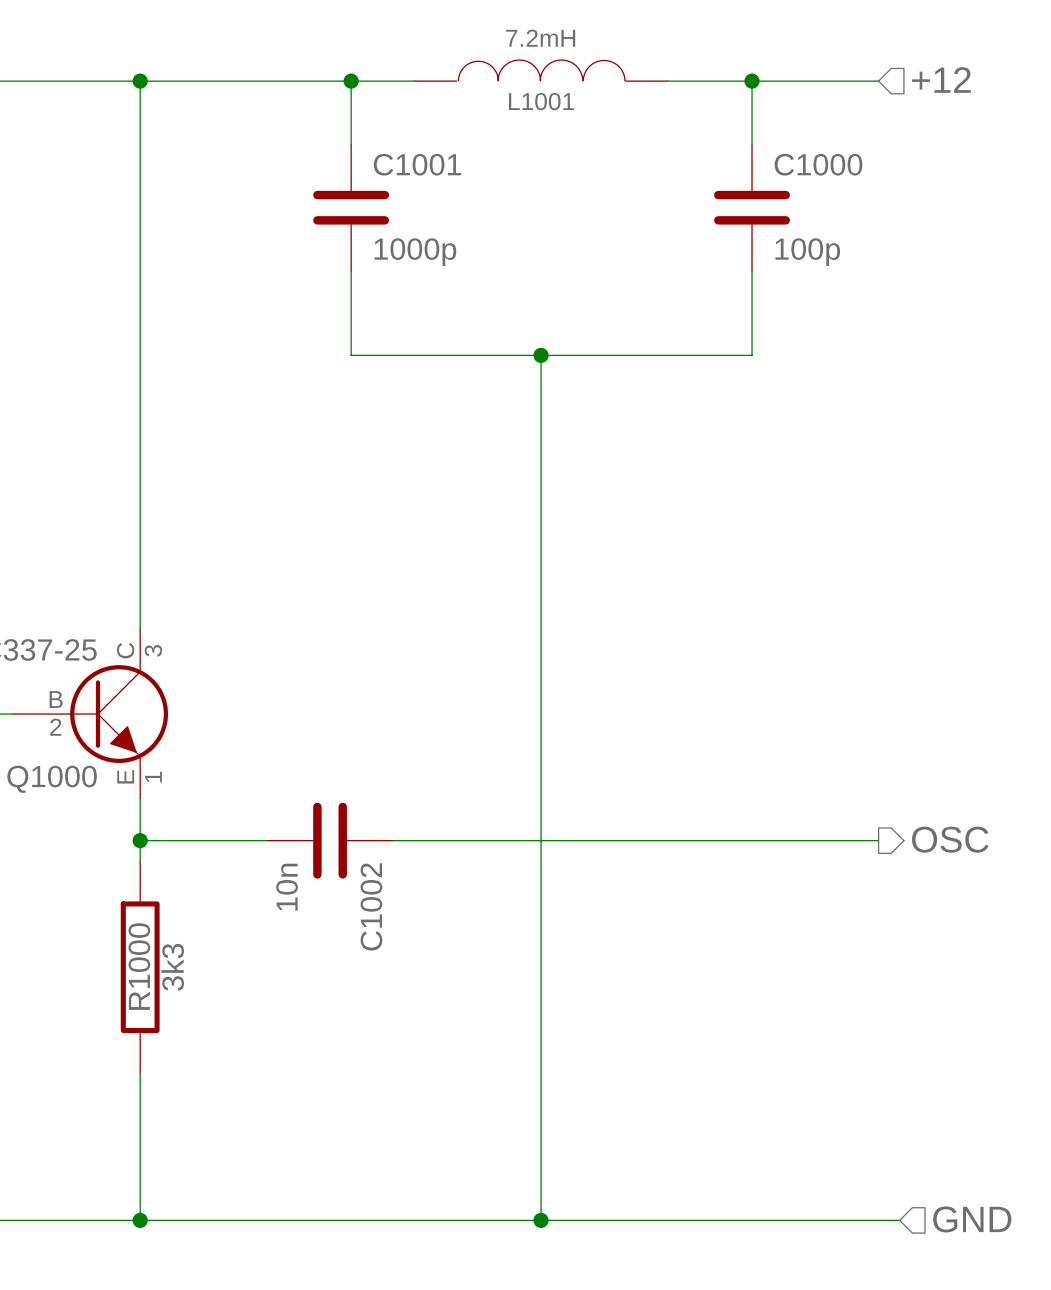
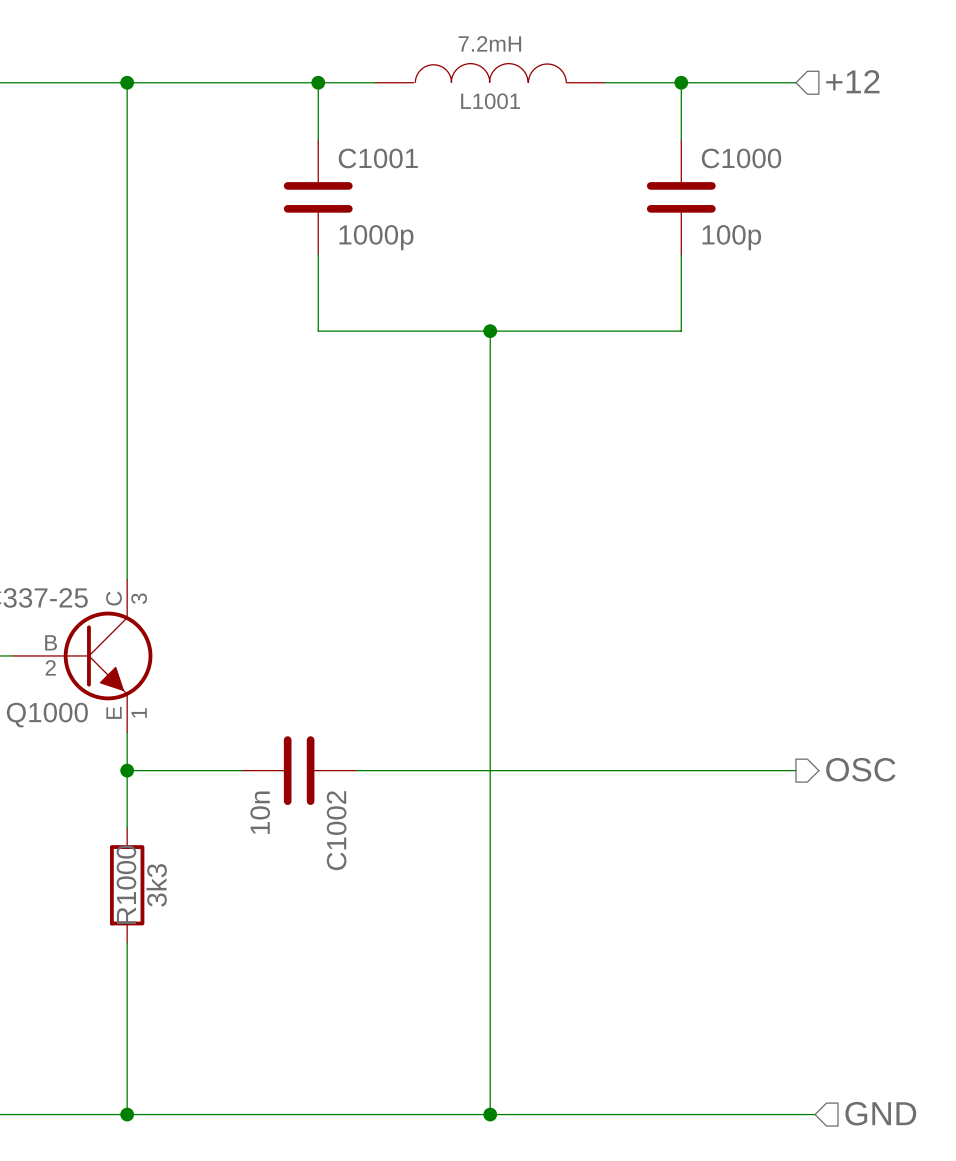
3k3 symbol: [120, 861, 160, 1073] -> [109, 827, 145, 943]

